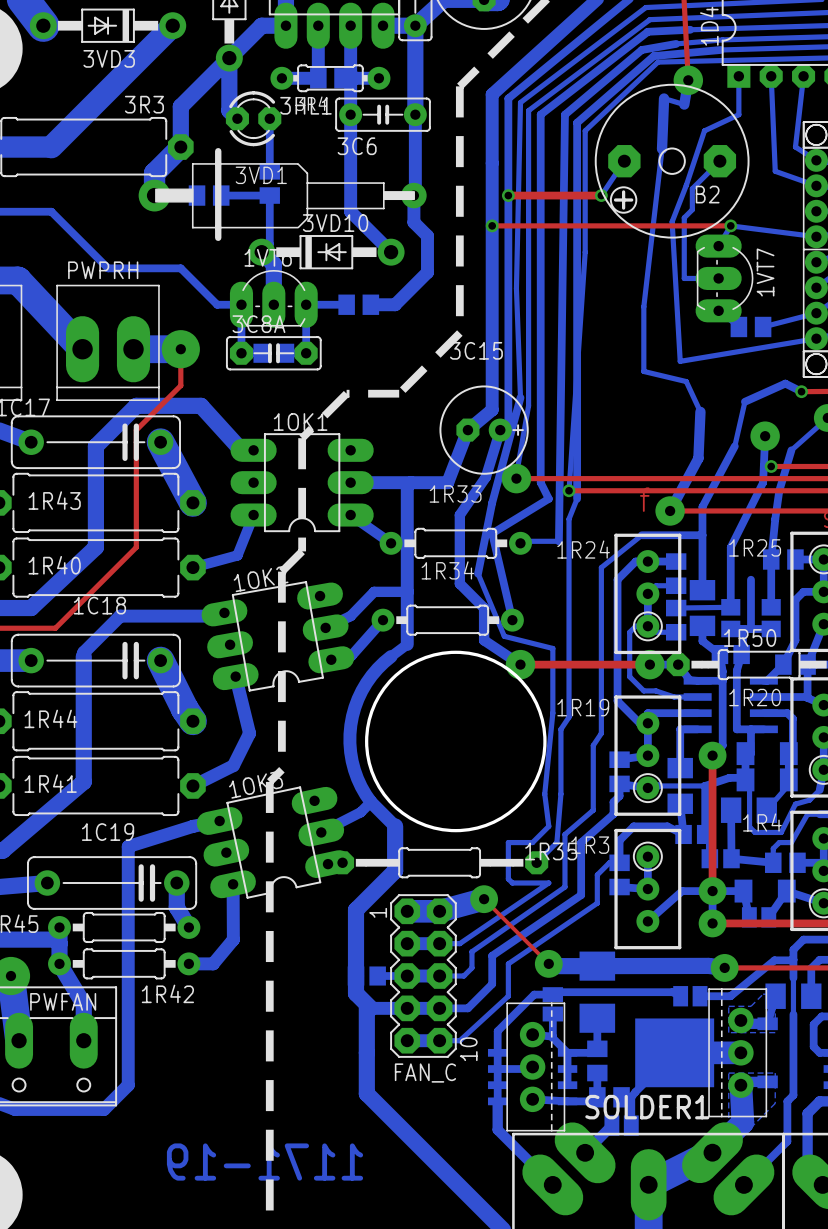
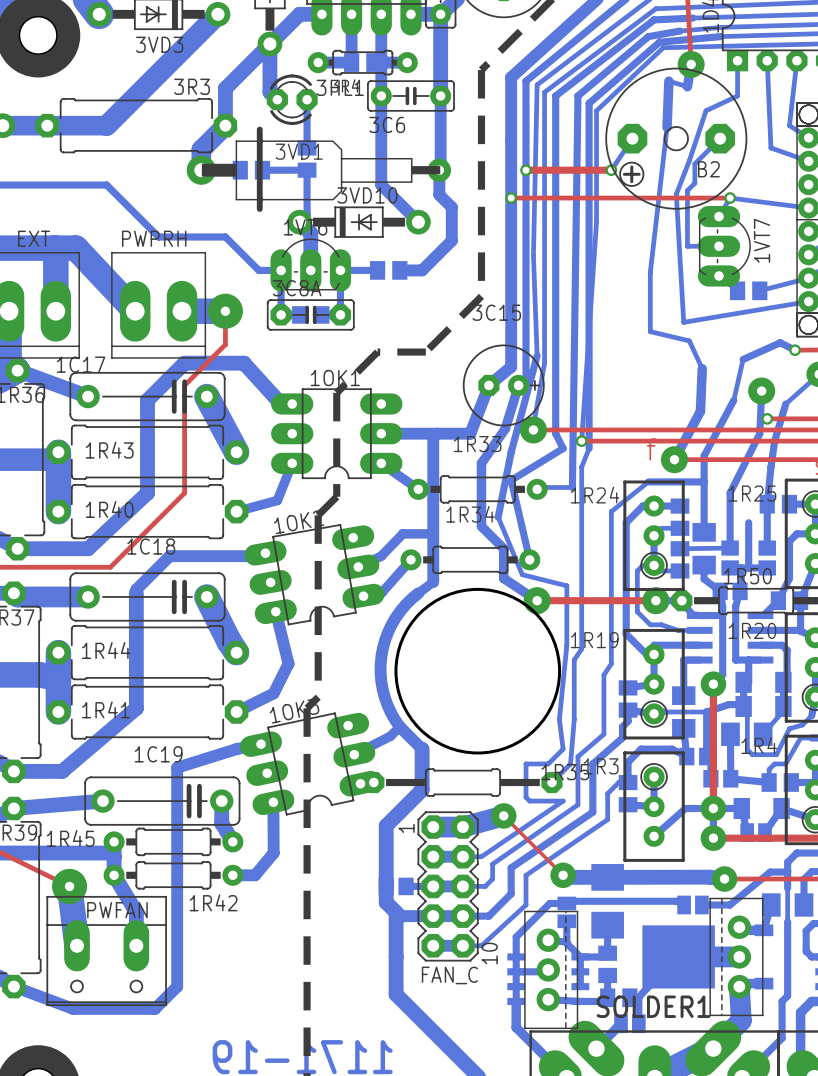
bottom zone outline: (763, 994) (750, 1006) (728, 1006) (728, 1032) (775, 1032) (775, 994) (763, 994) -> none
bottom zone outline: (728, 1073) (775, 1073) (775, 1103) (750, 1127) (728, 1127) (728, 1073) -> none

